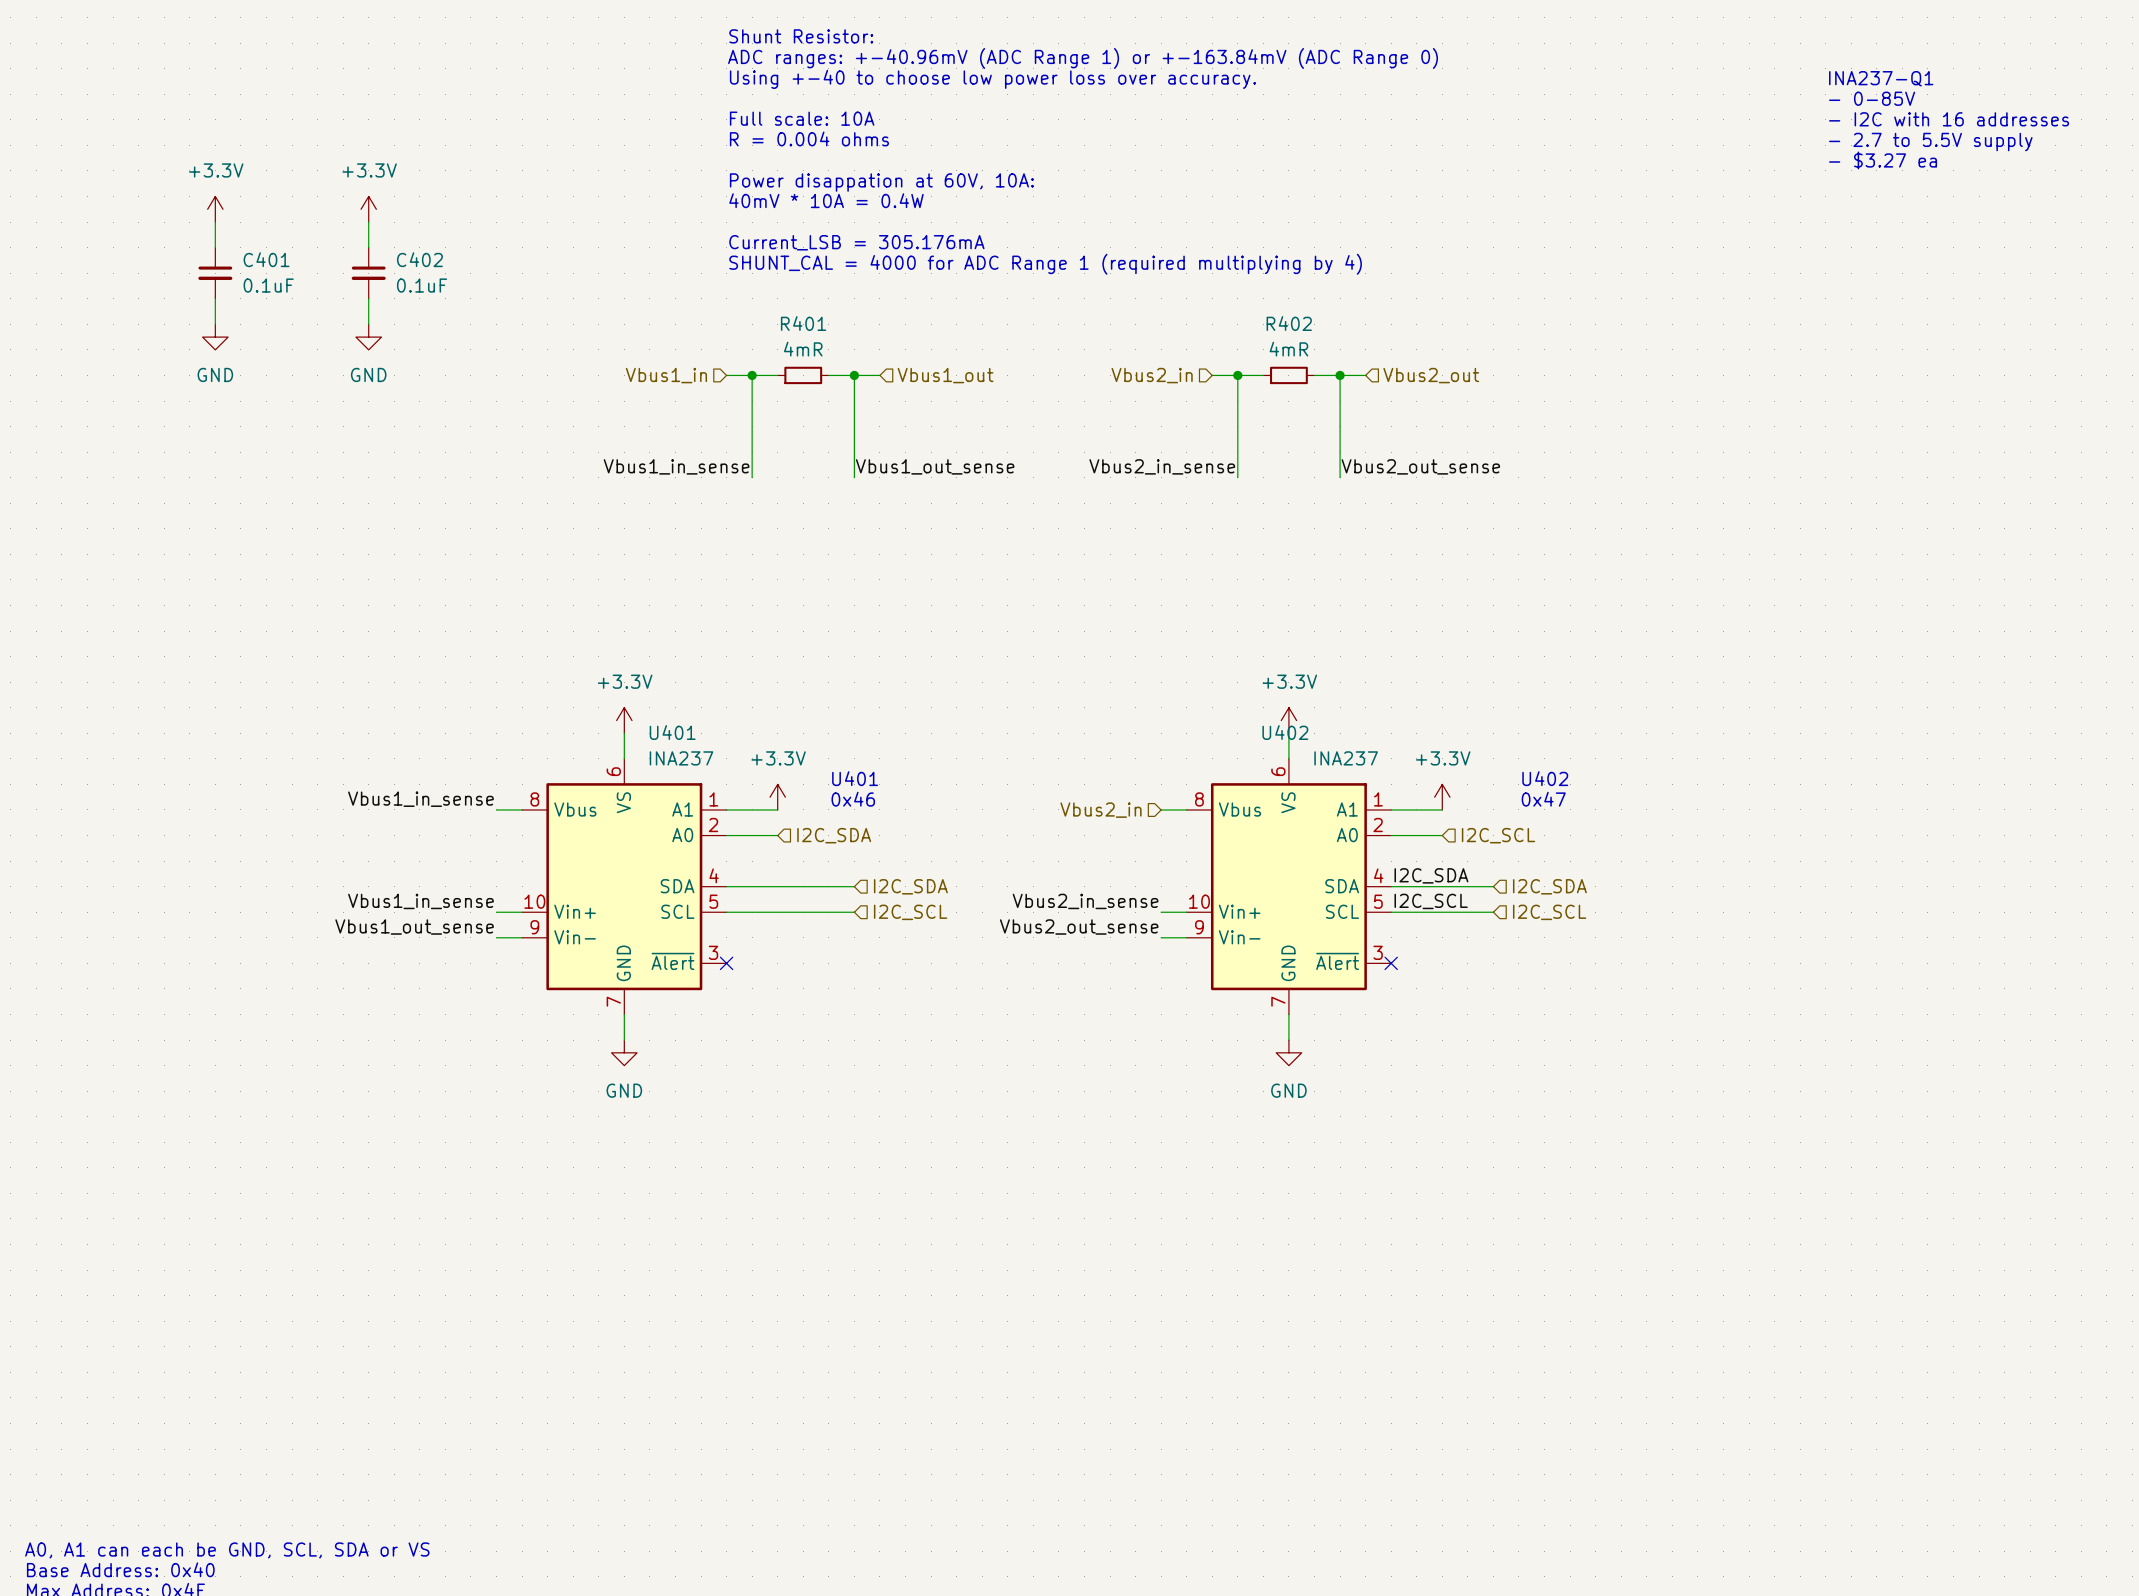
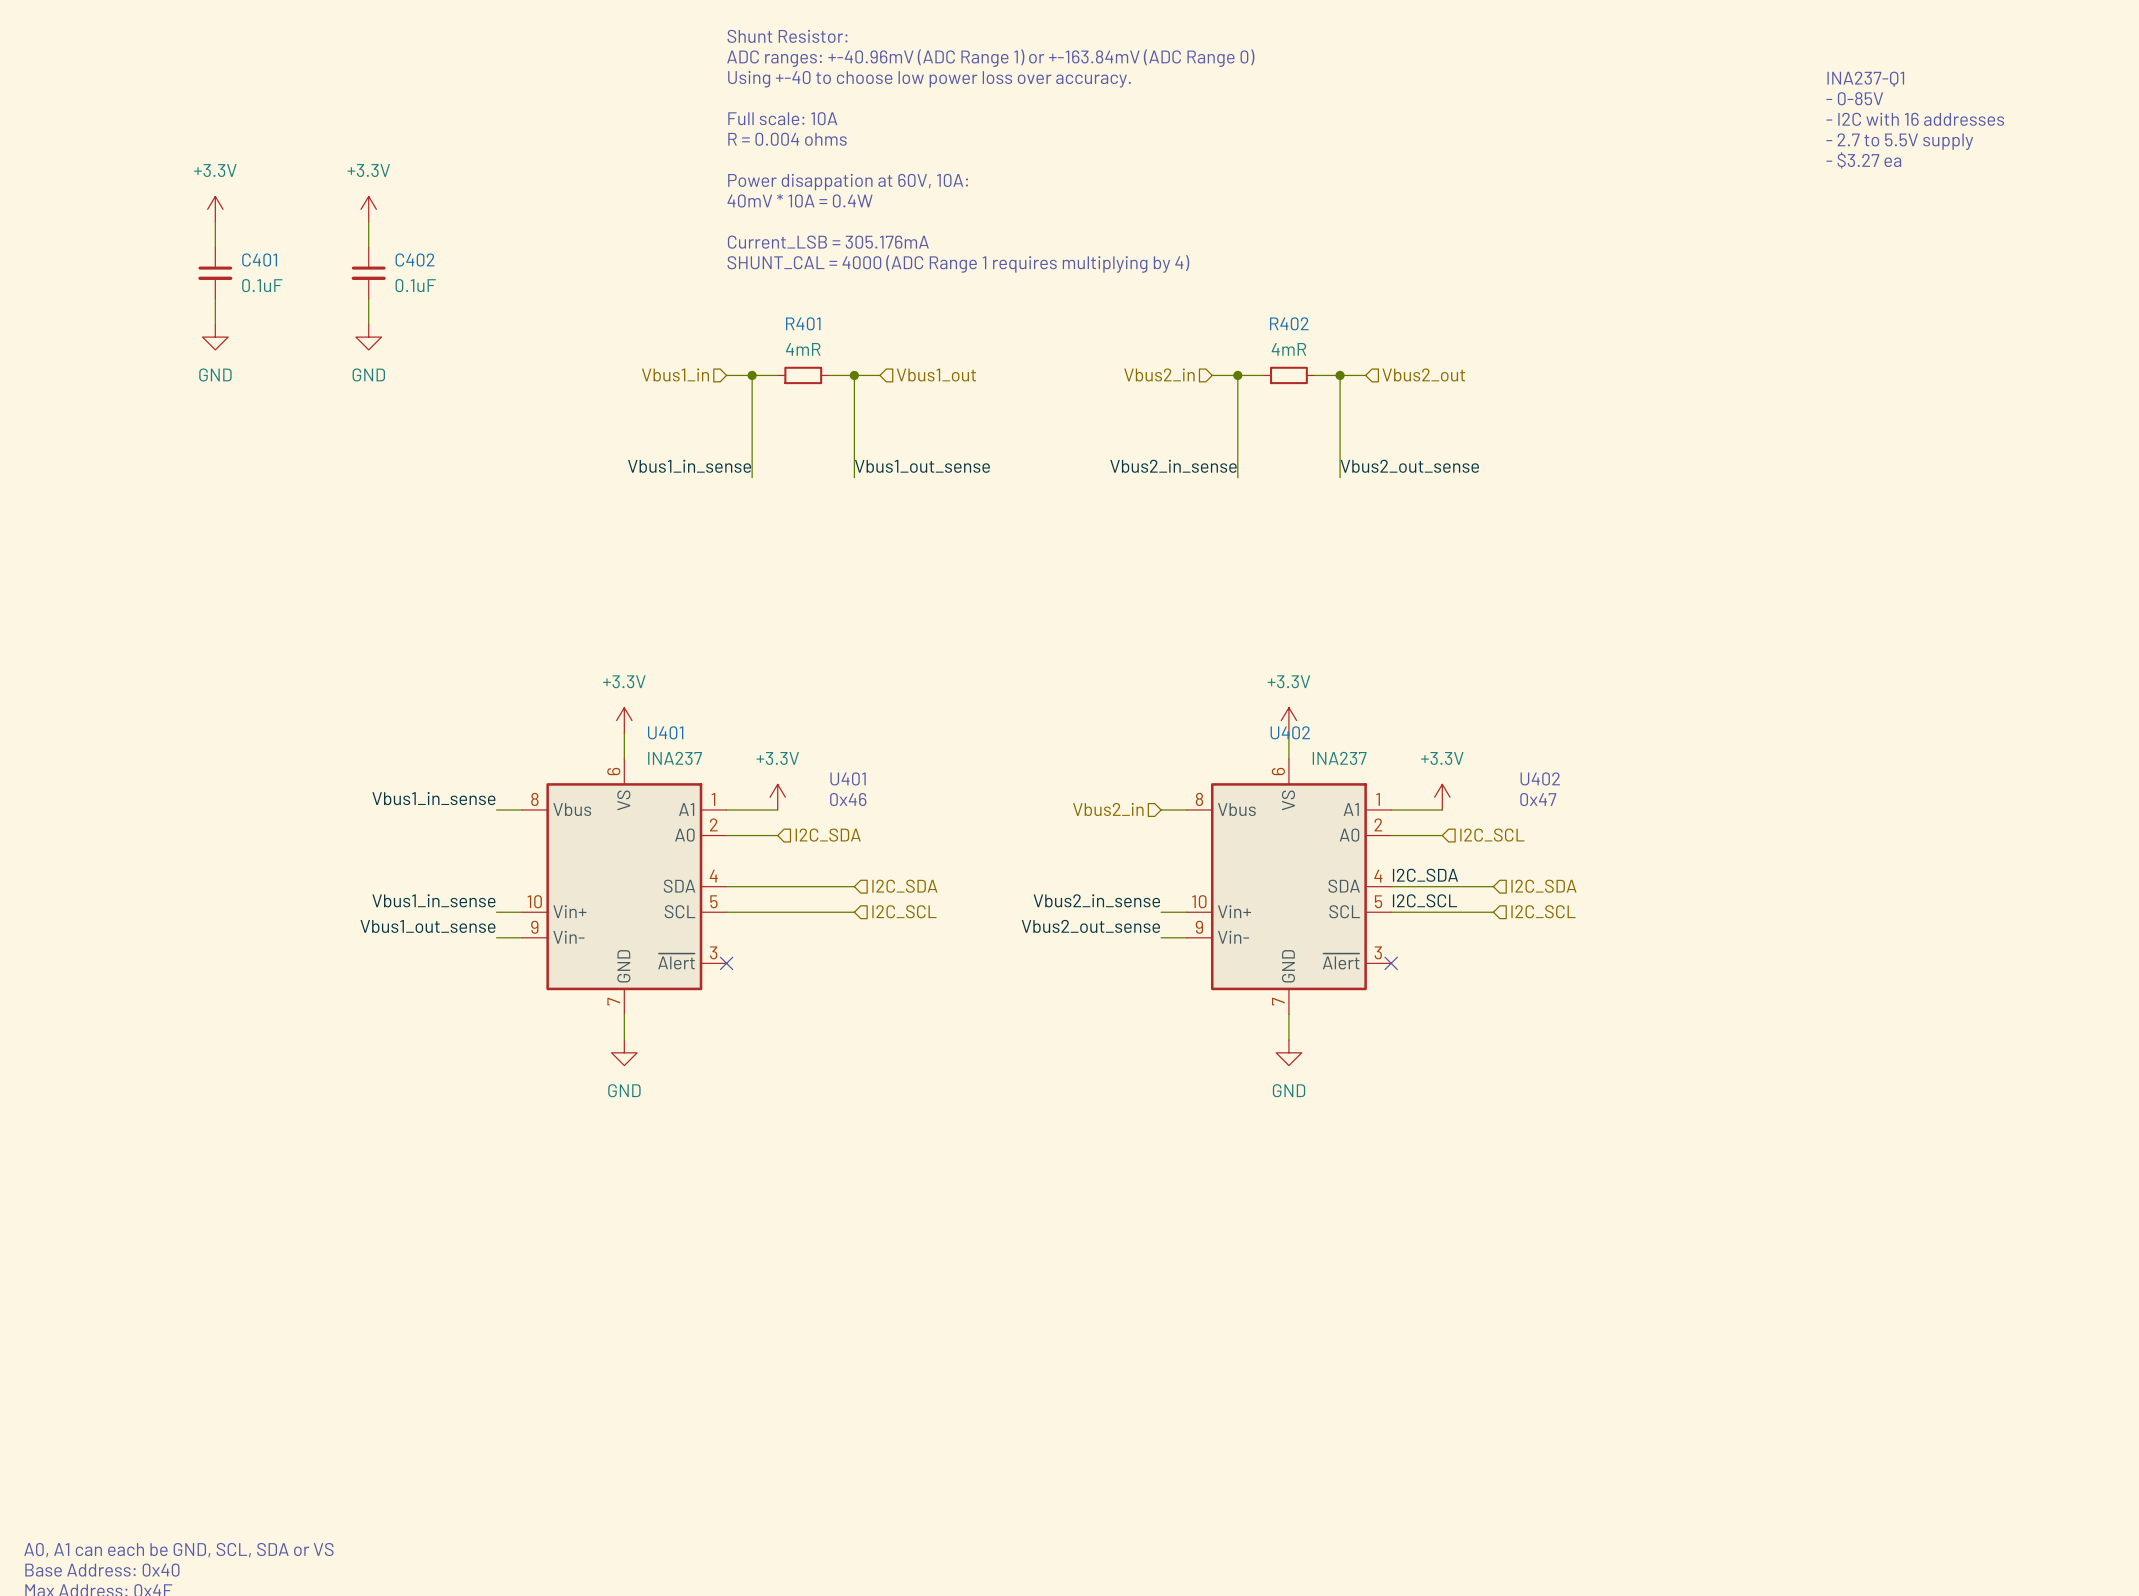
text: SHUNT_CAL = 4000 for ADC Range 1 (required multiplying by 4) (1045, 264) -> SHUNT_CAL = 4000 (ADC Range 1 requires multiplying by 4) (958, 263)

